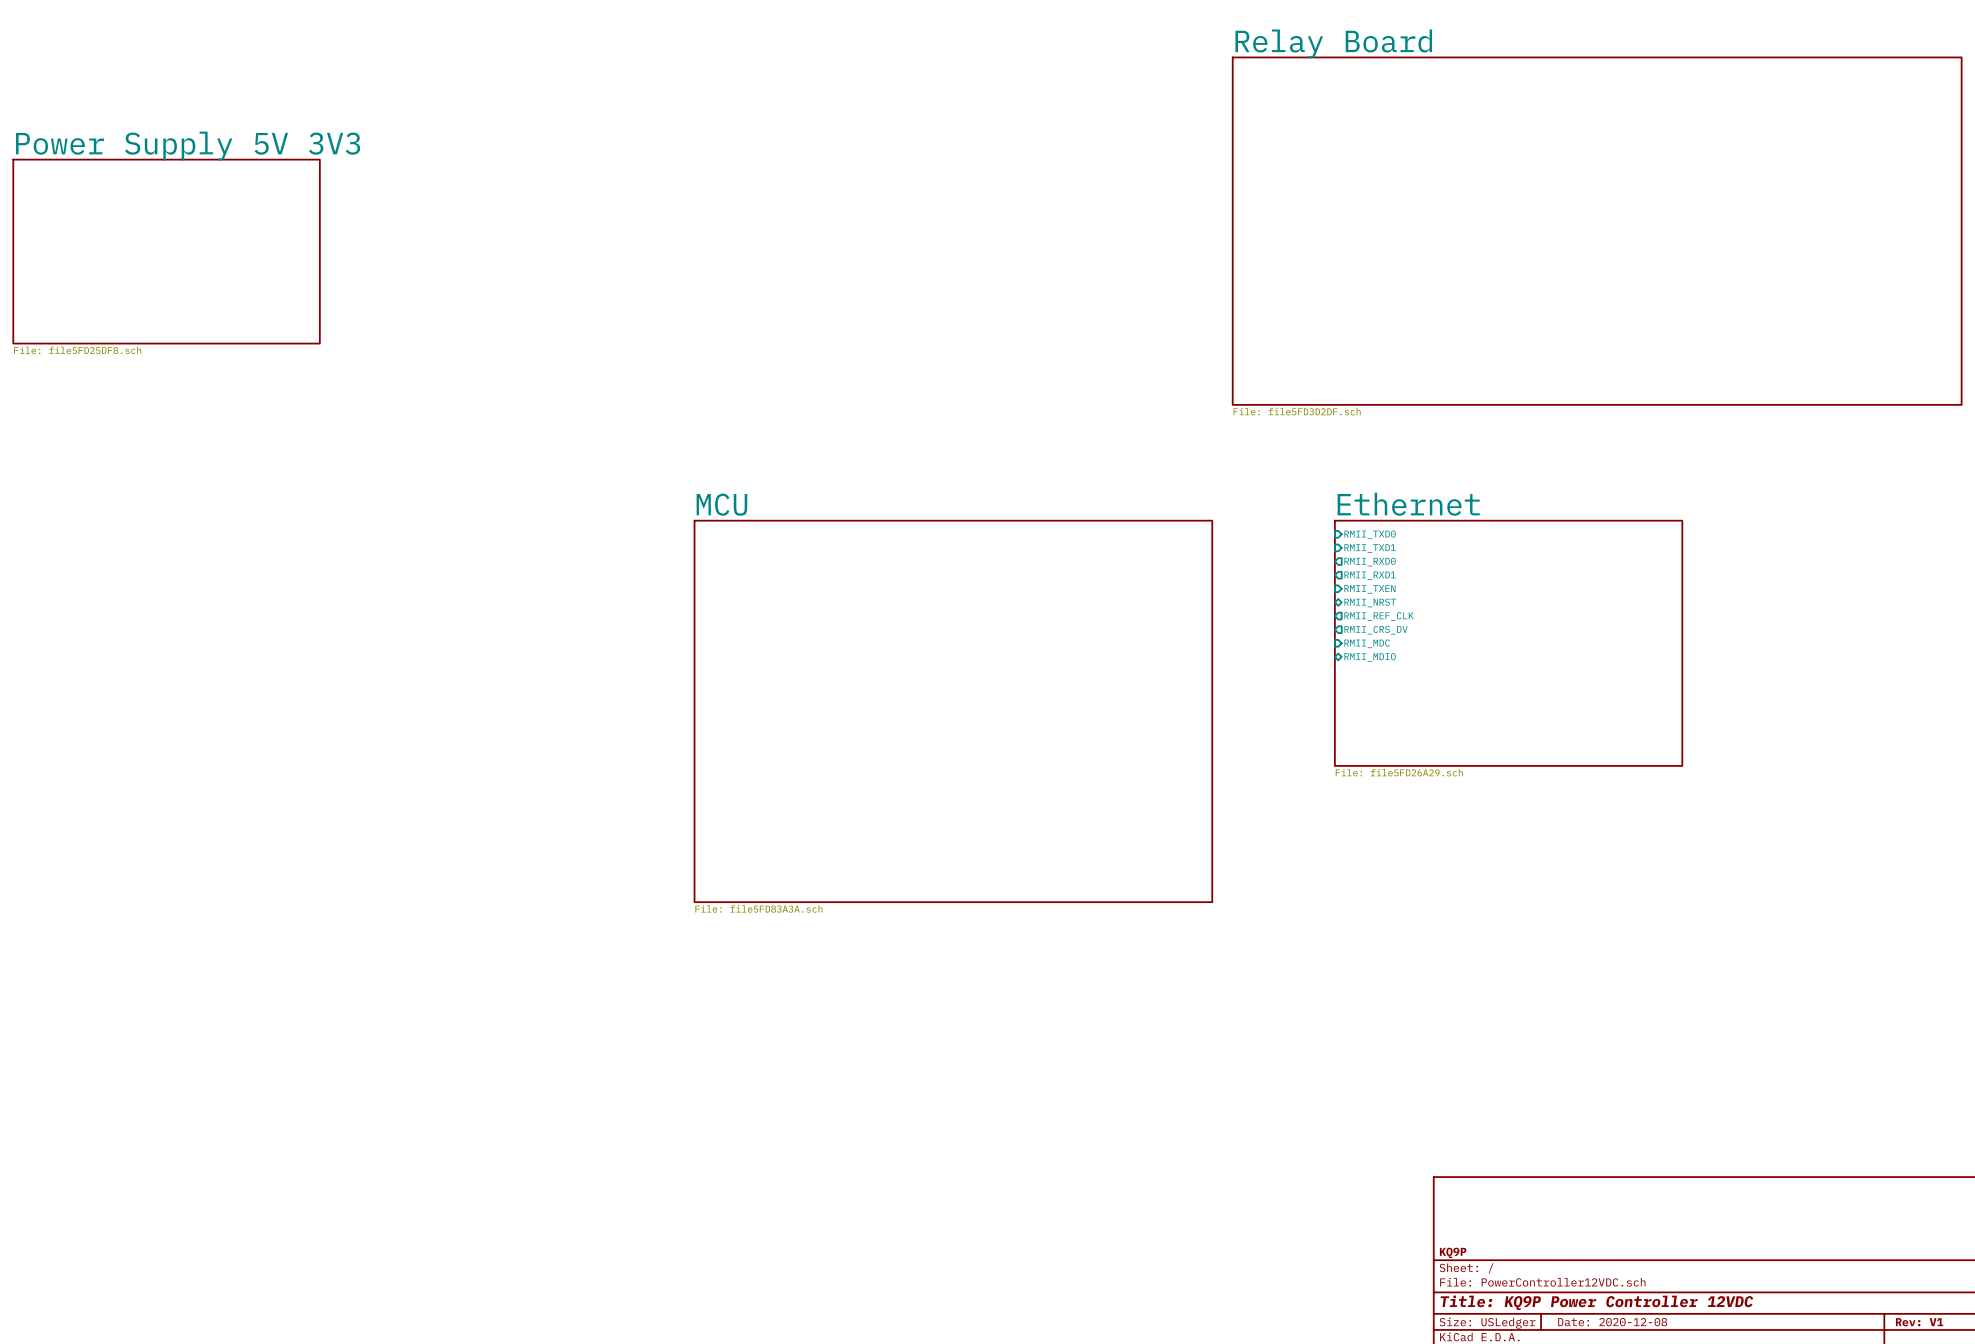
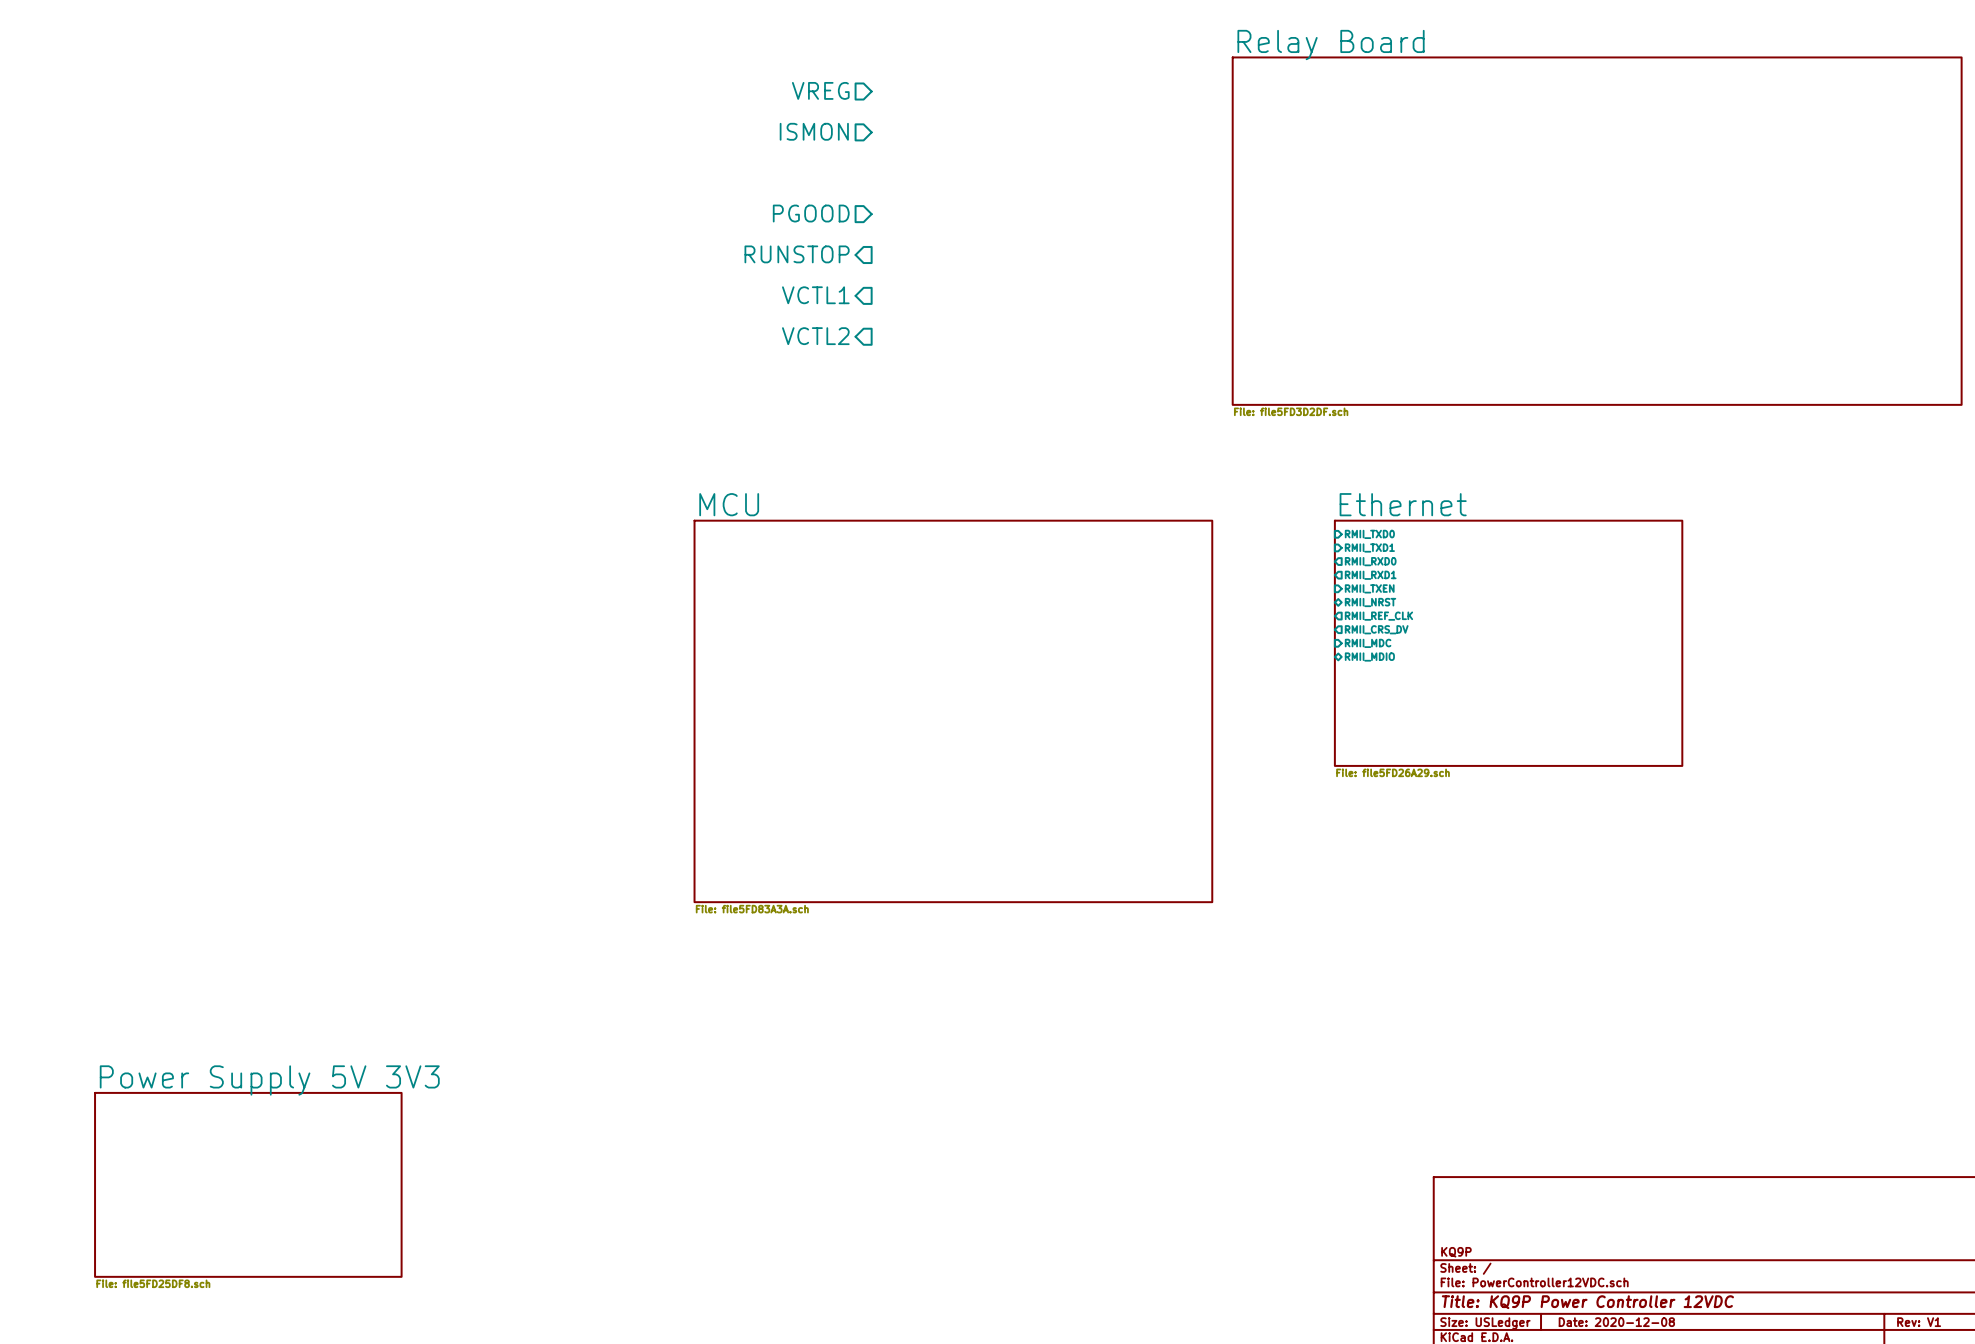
sheet pin: none -> VREG (820, 90)
sheet pin: none -> ISMON (814, 131)
sheet pin: none -> PGOOD (811, 213)
sheet Power Supply 5V 3V3 position: (166, 251) -> (248, 1184)
sheet pin: none -> RUNSTOP (797, 254)
sheet pin: none -> VCTL1 (815, 295)
sheet pin: none -> VCTL2 (815, 336)

